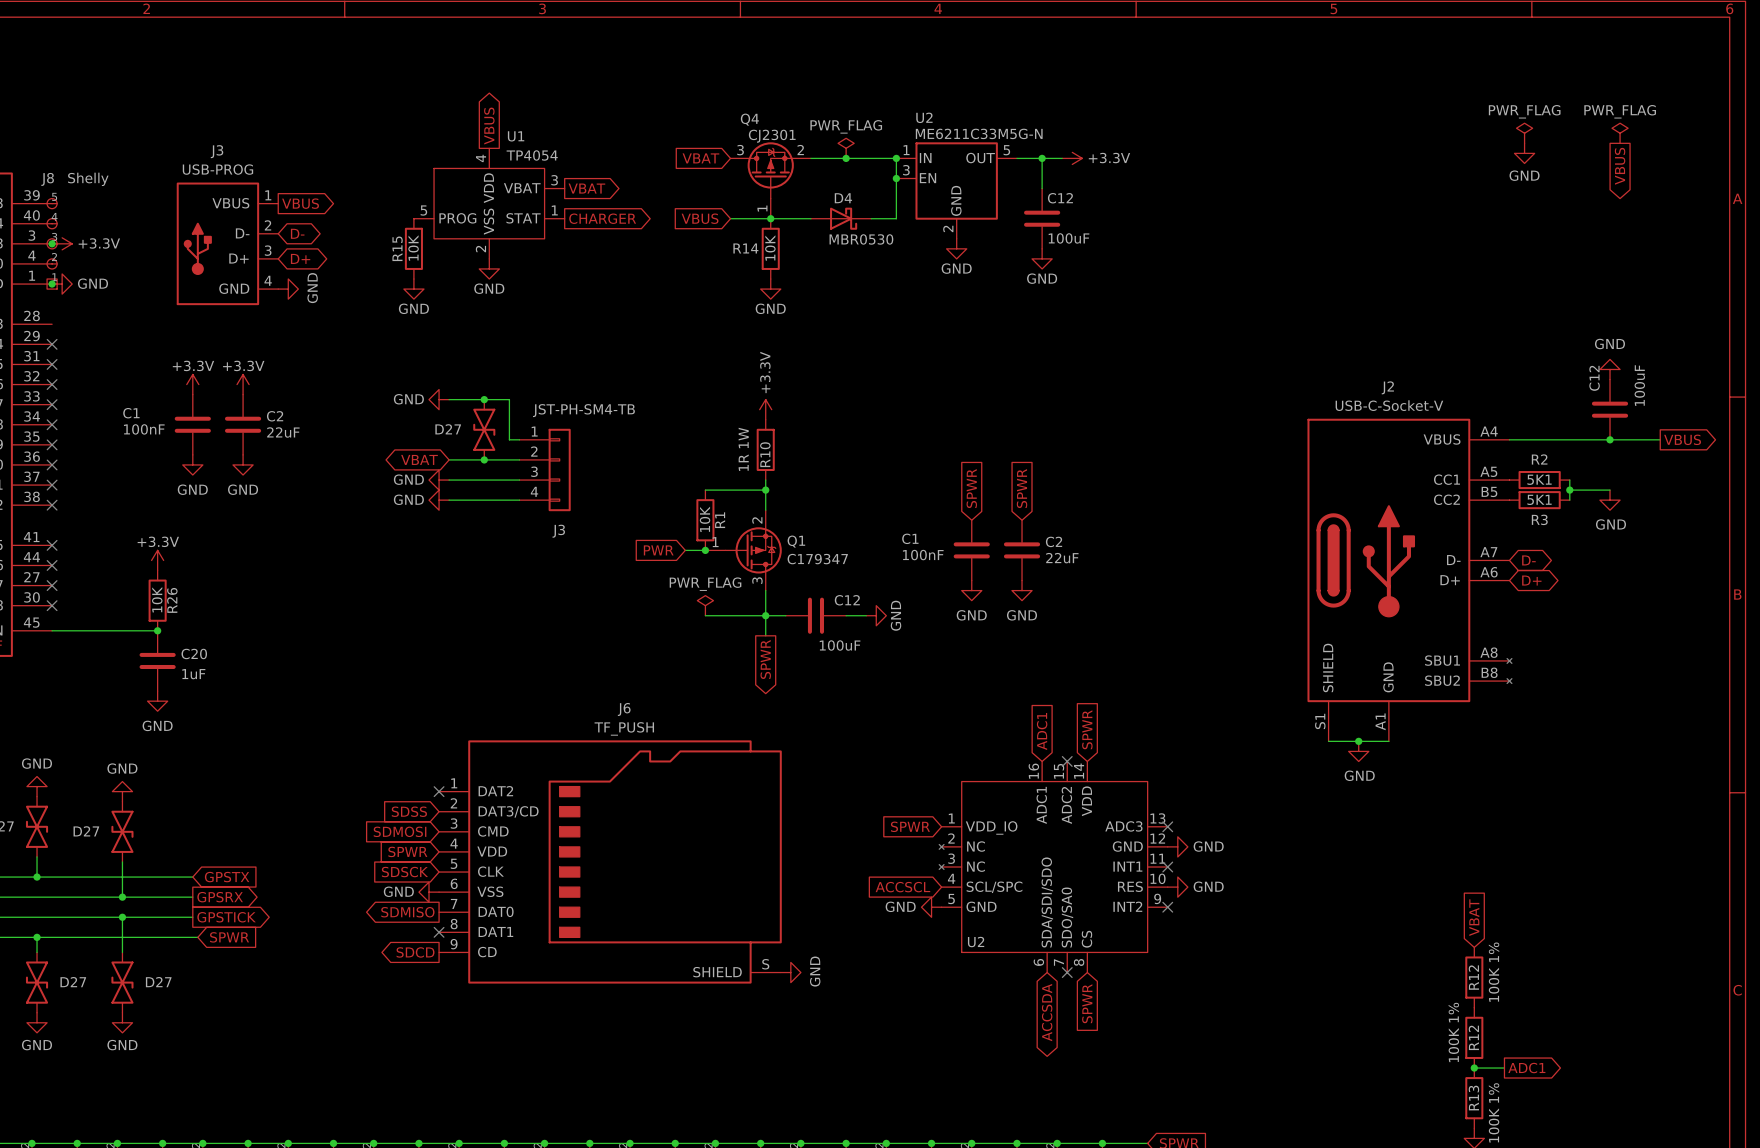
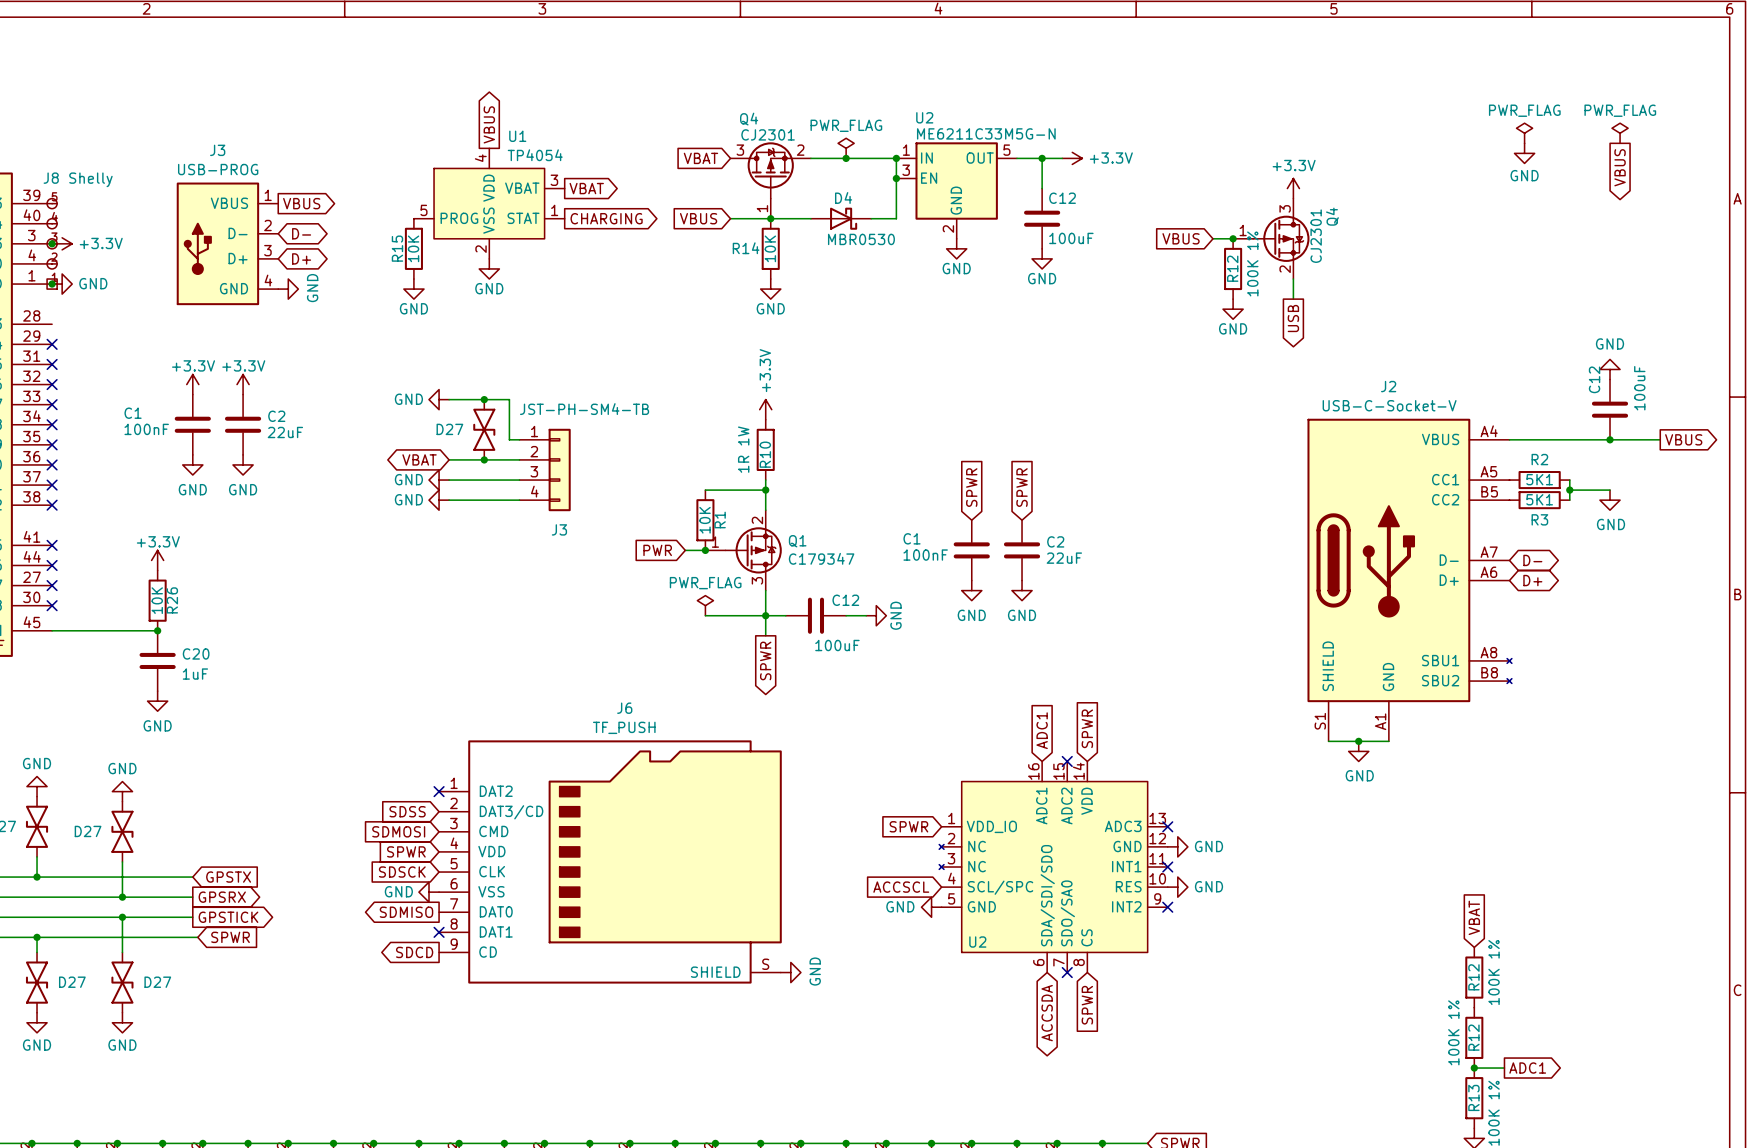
power symbol: none -> +3.3V (1293, 188)
global label: CHARGER (602, 218) -> CHARGING (606, 218)
global label: none -> VBUS (1181, 238)
wire: none -> (1212, 238) (1233, 238)
junction: none -> (1233, 238)
Q4: none -> CJ2301 (1271, 238)
R12: none -> 100K 1% (1233, 268)
wire: none -> (1293, 279) (1293, 299)
power symbol: none -> GND (1233, 309)
global label: none -> USB (1293, 318)

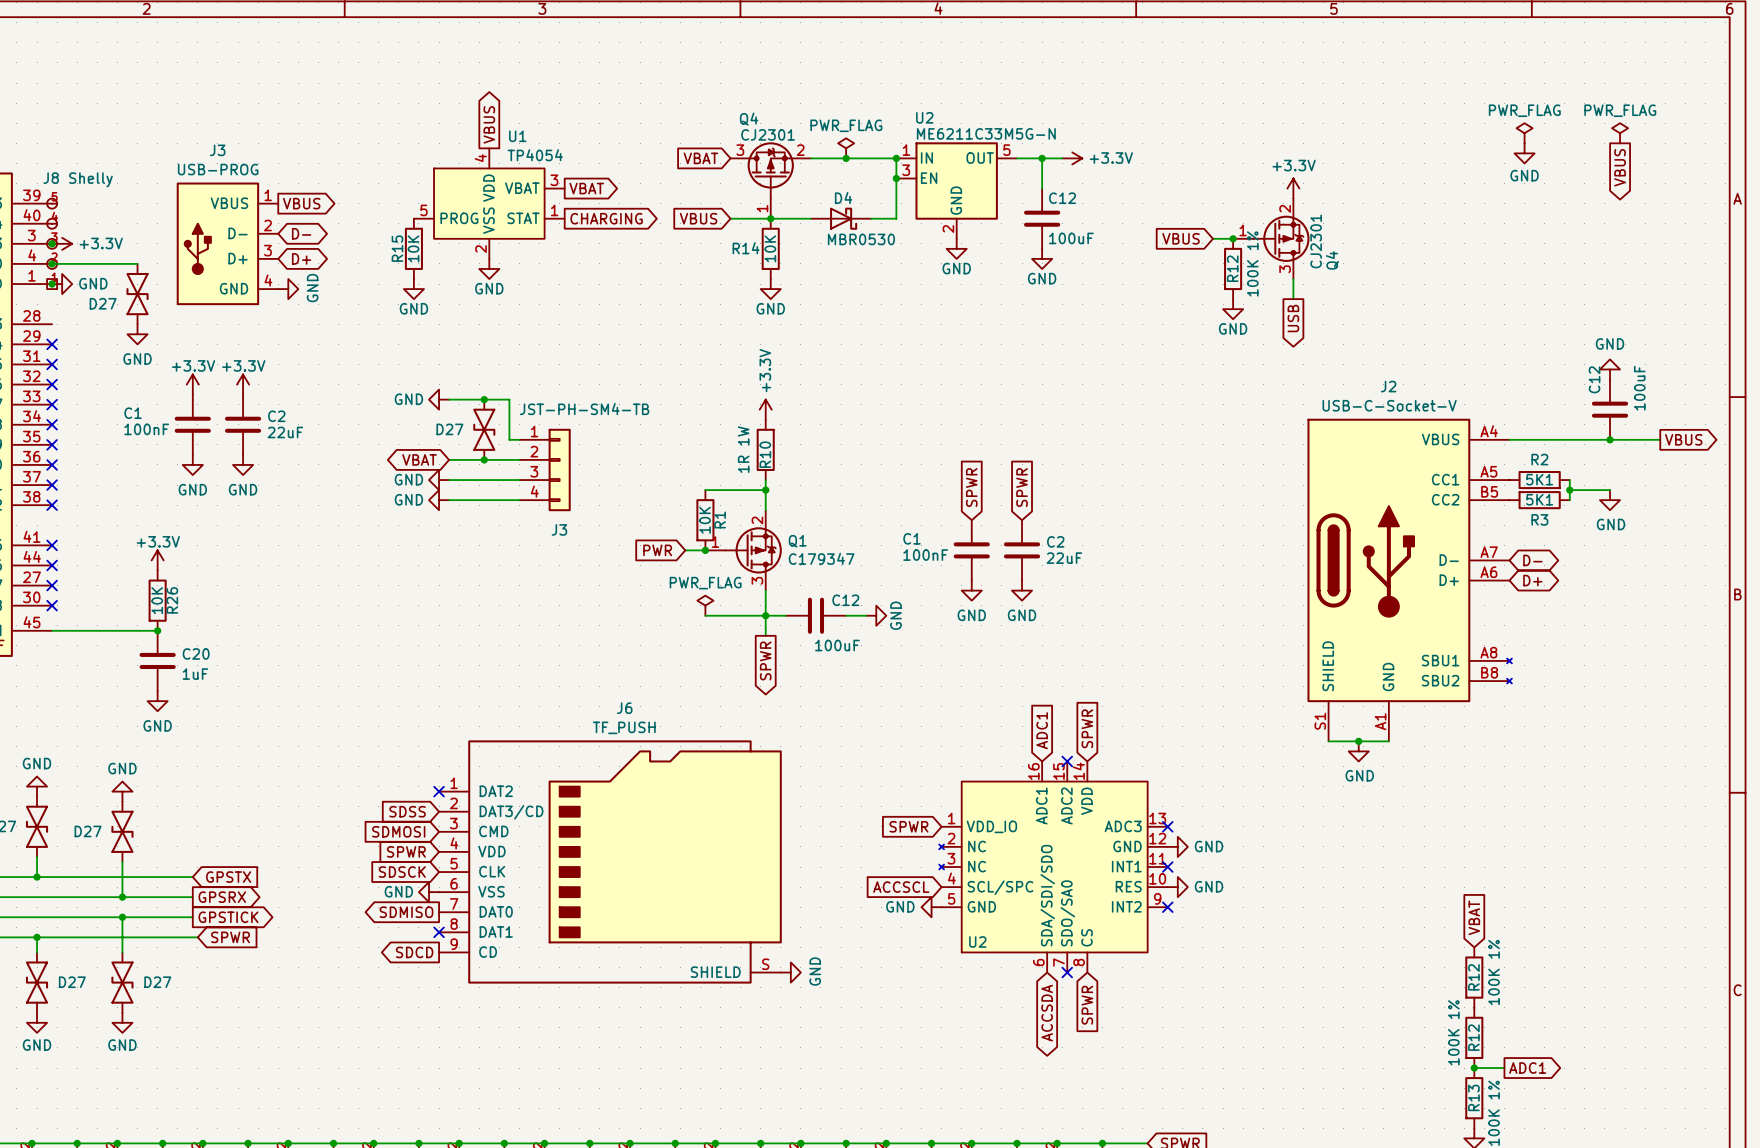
Q4 flip: as is (1281, 238) -> up-down (1281, 238)
wire: none -> (52, 263) (137, 263)
junction: none -> (52, 263)
D27: none -> (137, 294)
power symbol: none -> GND (137, 334)

